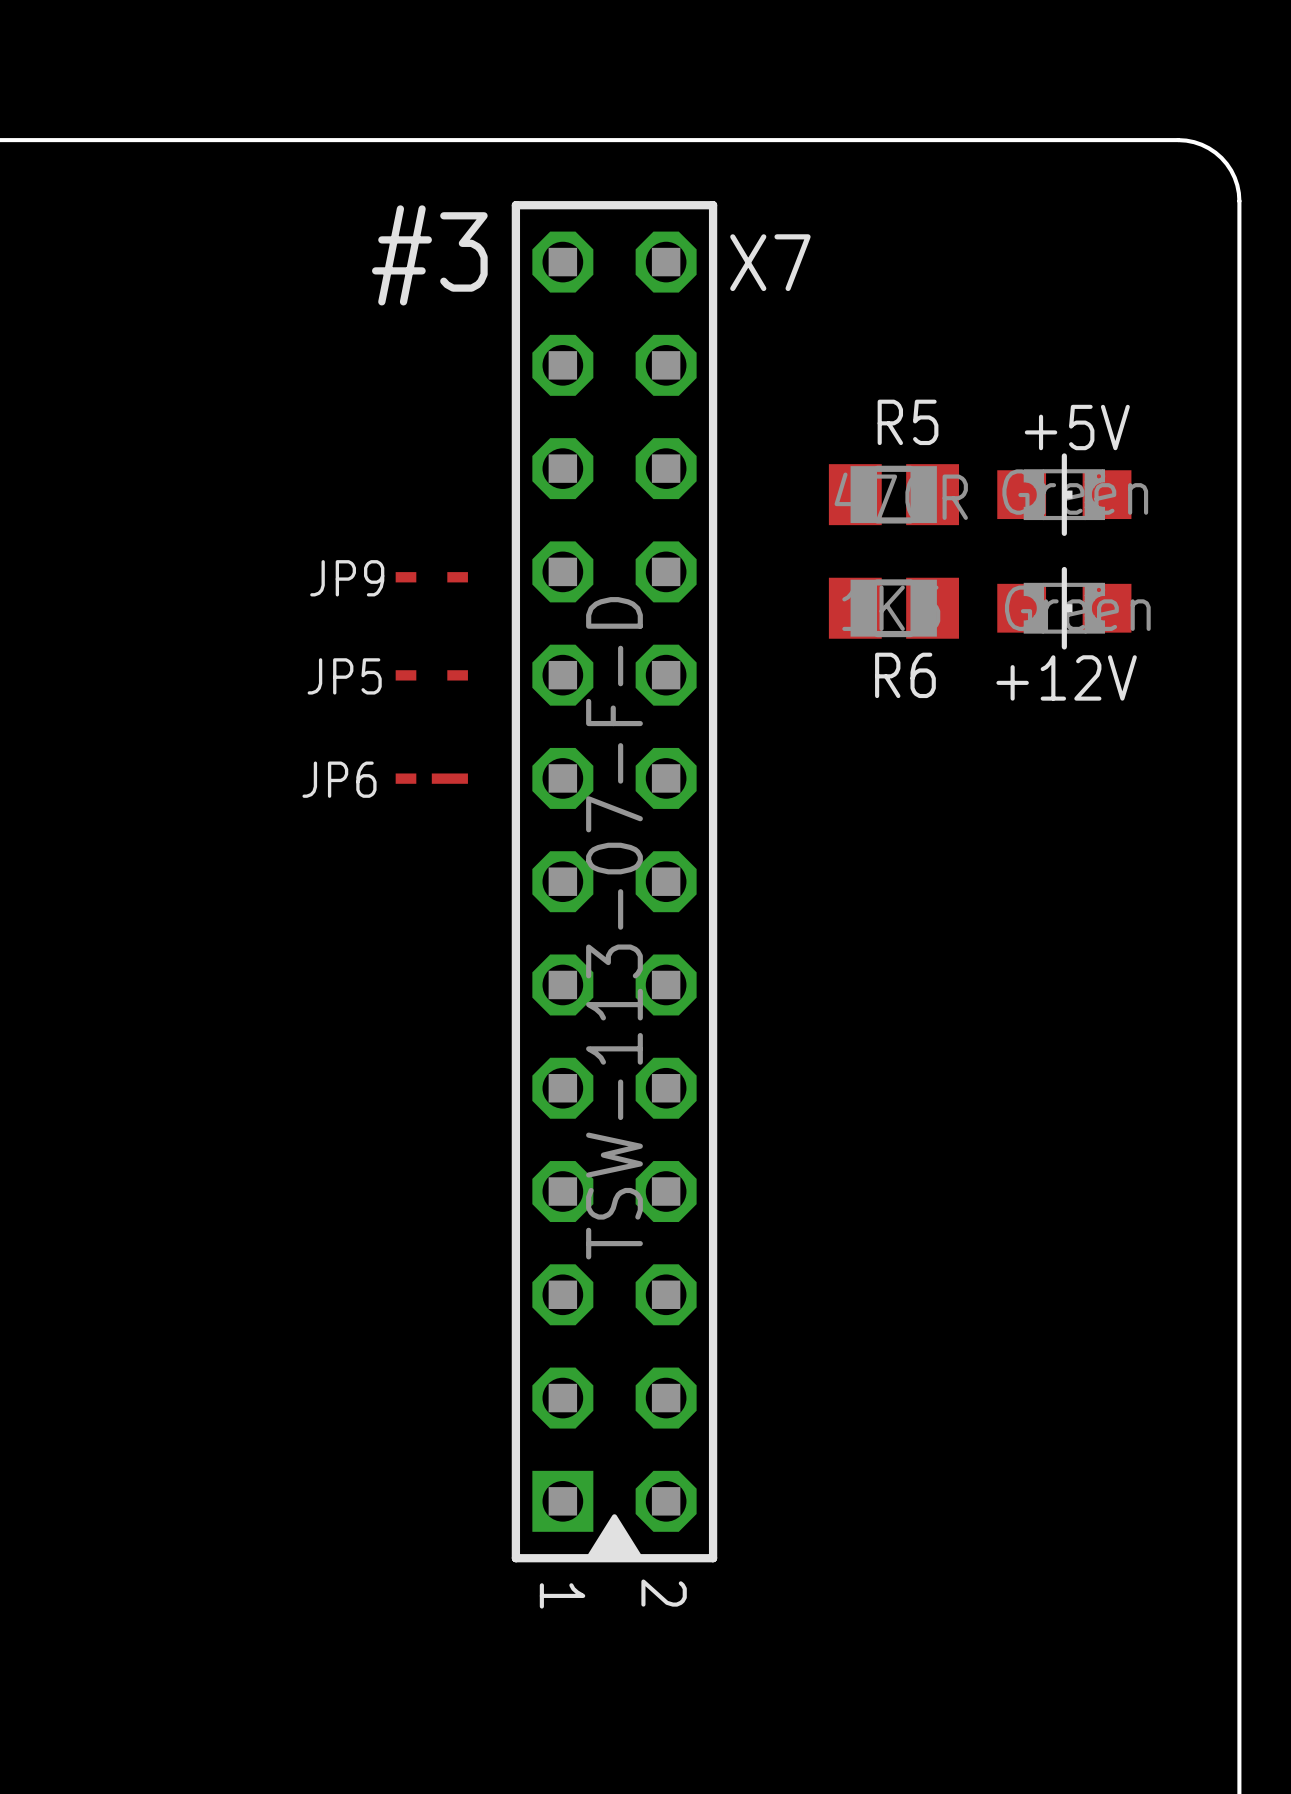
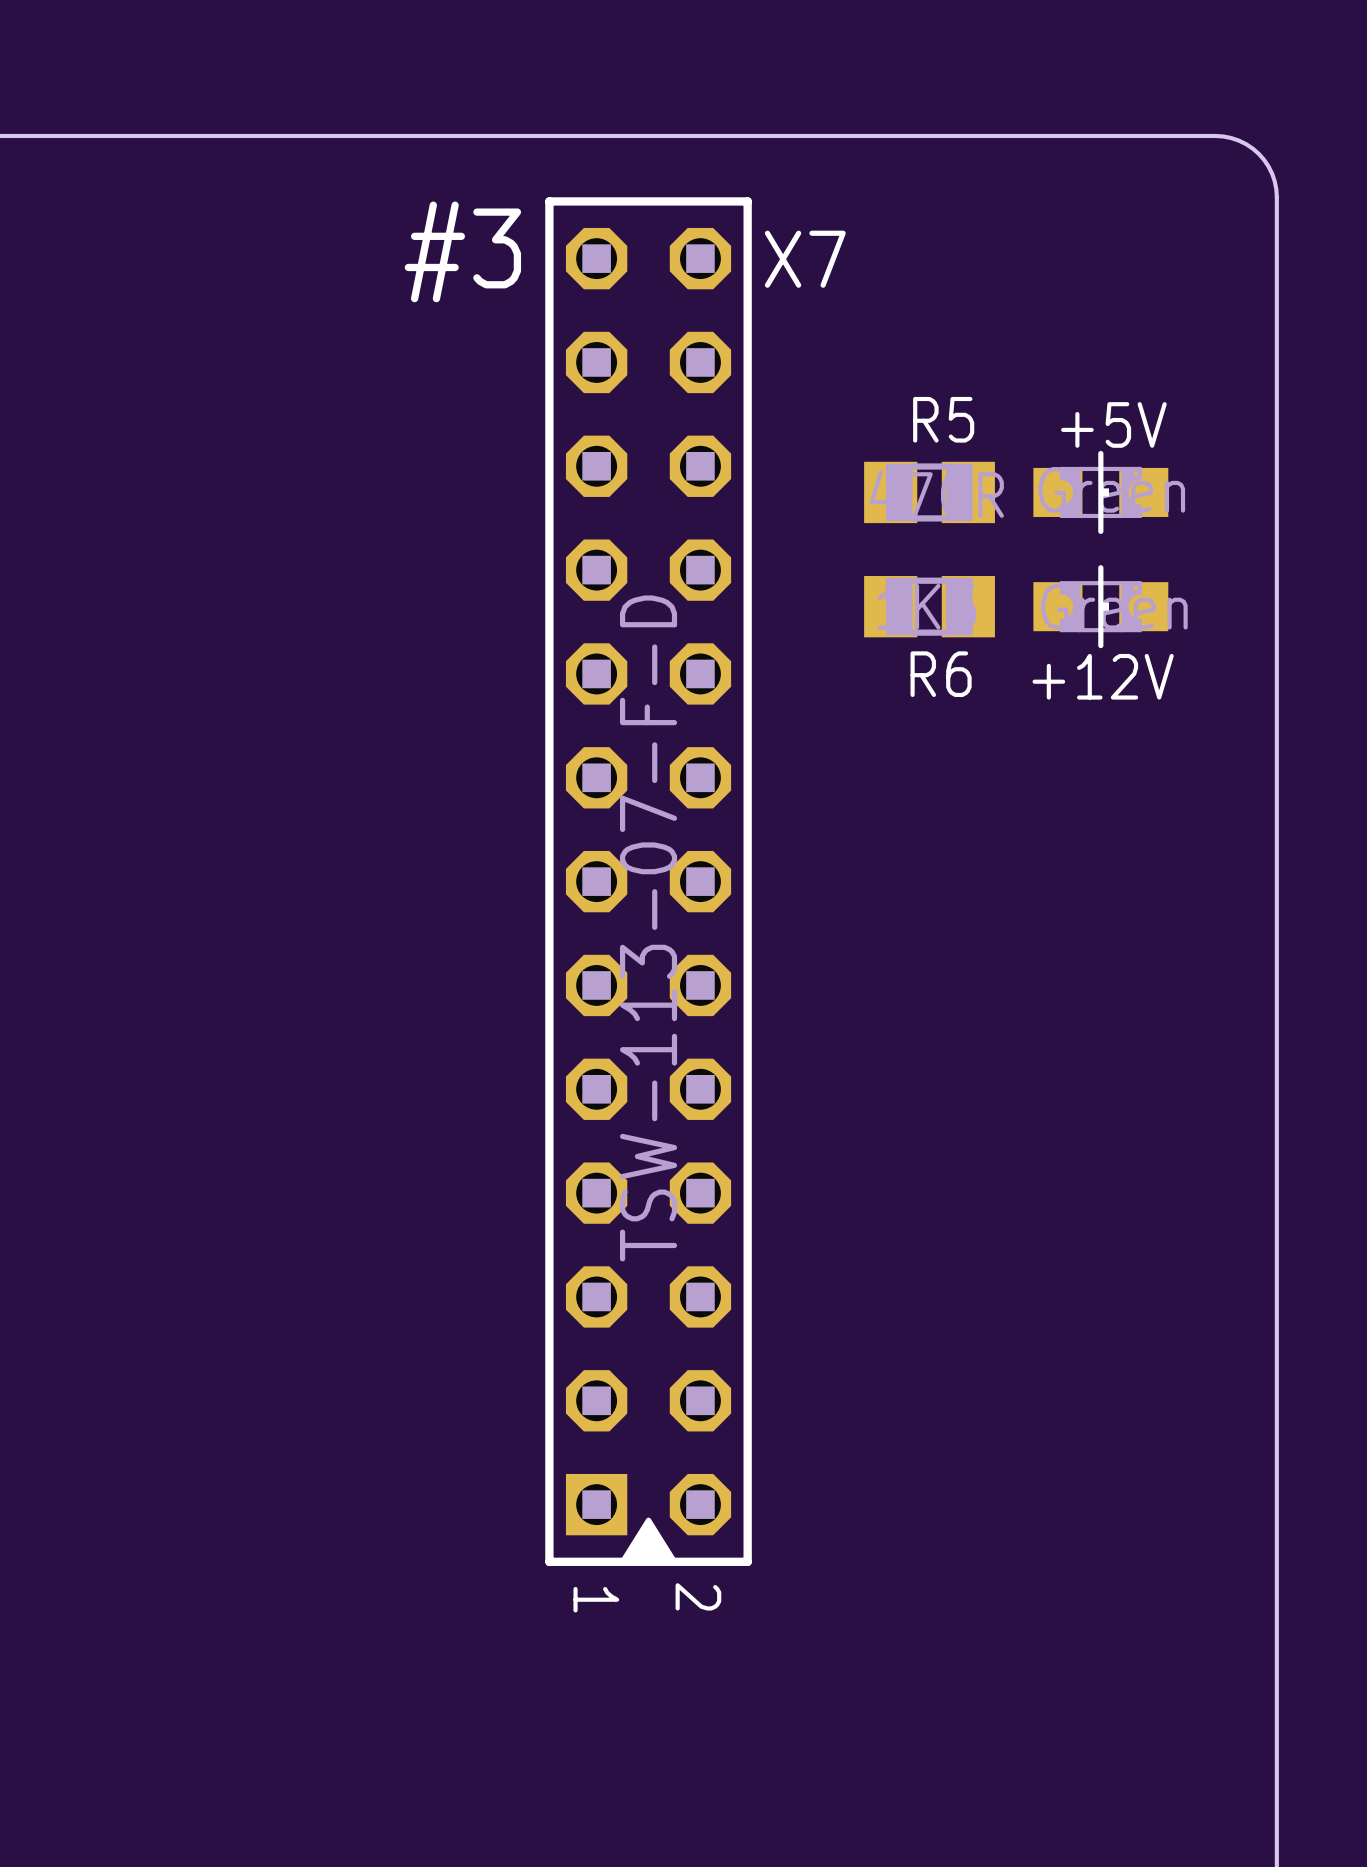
JP9: (431, 577) -> none
JP5: (431, 675) -> none
JP6: (431, 778) -> none

